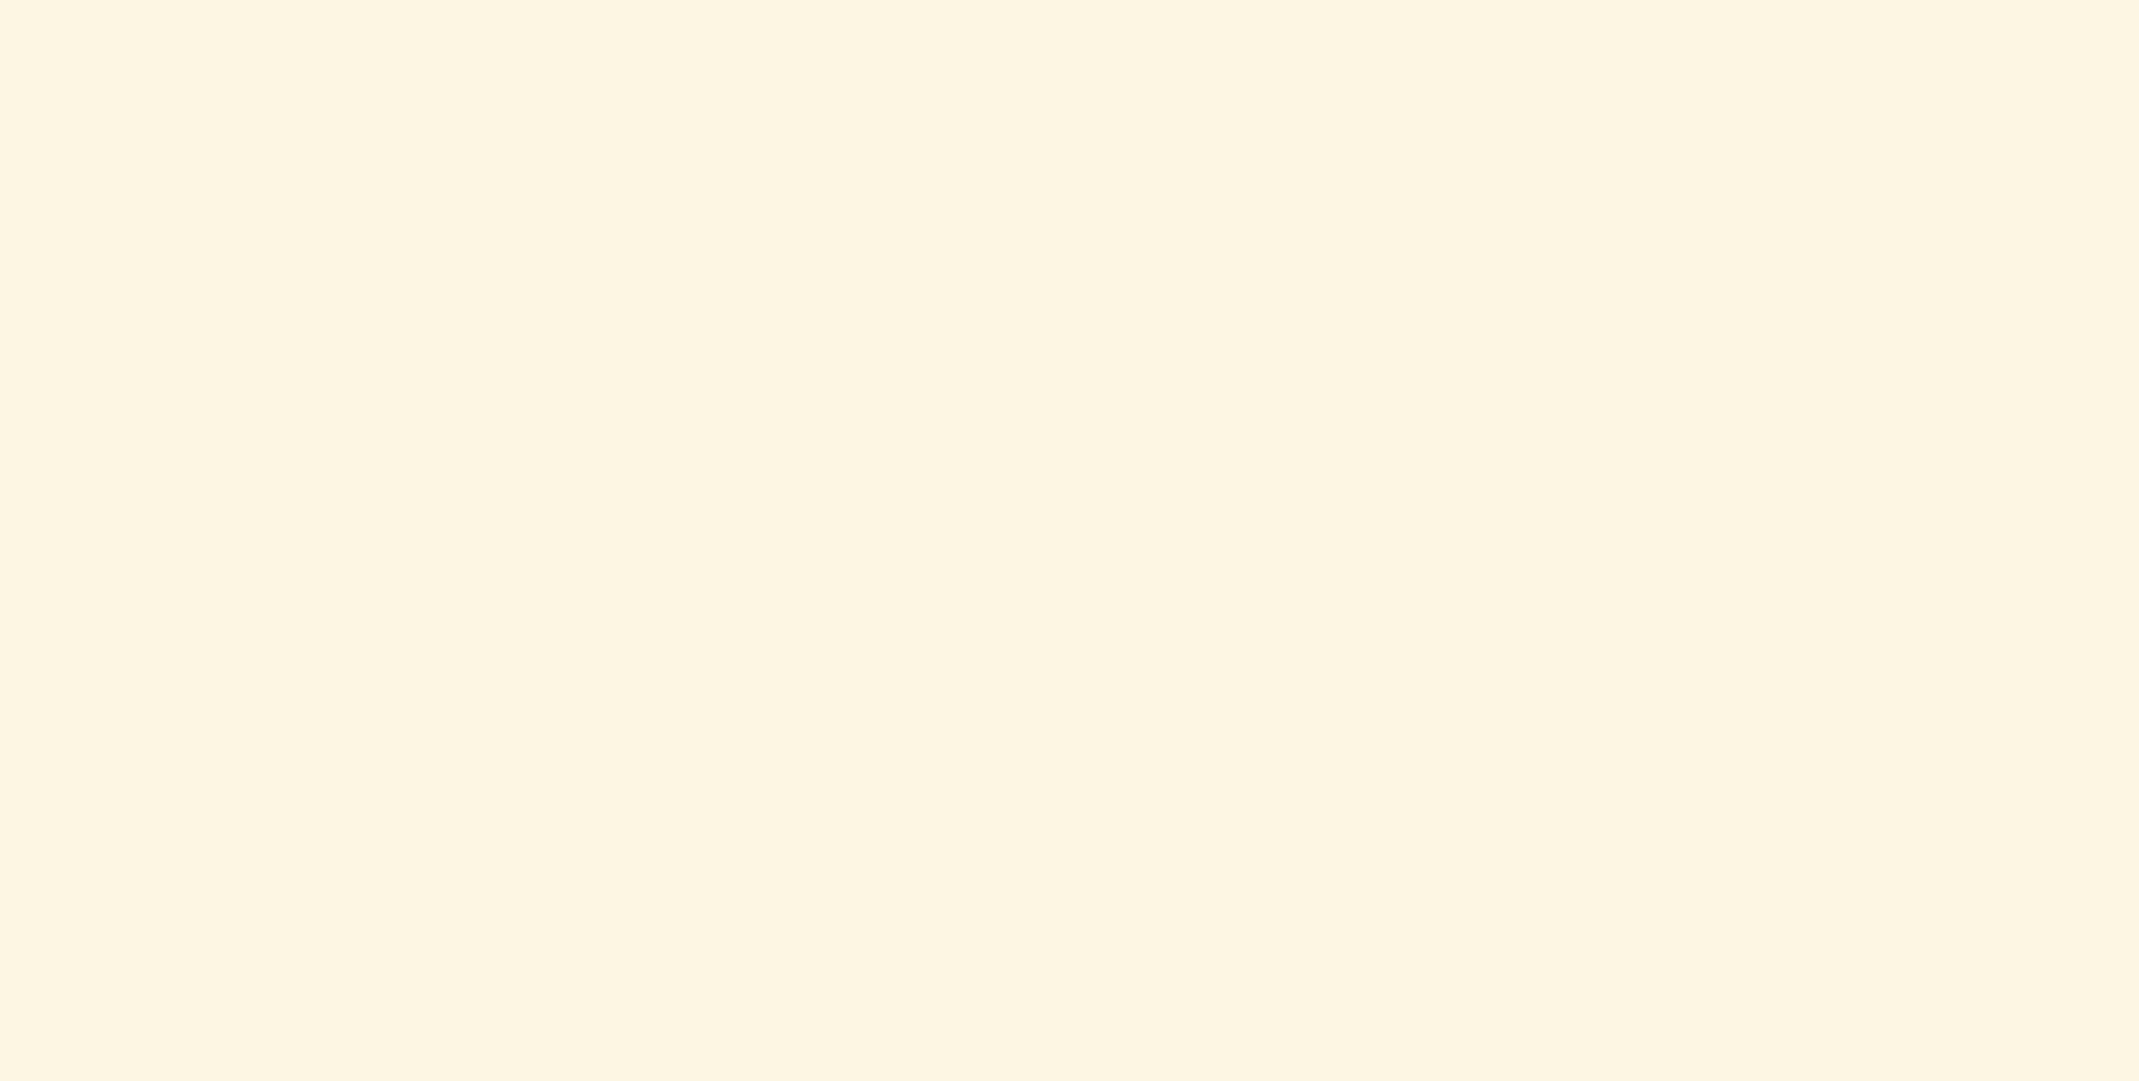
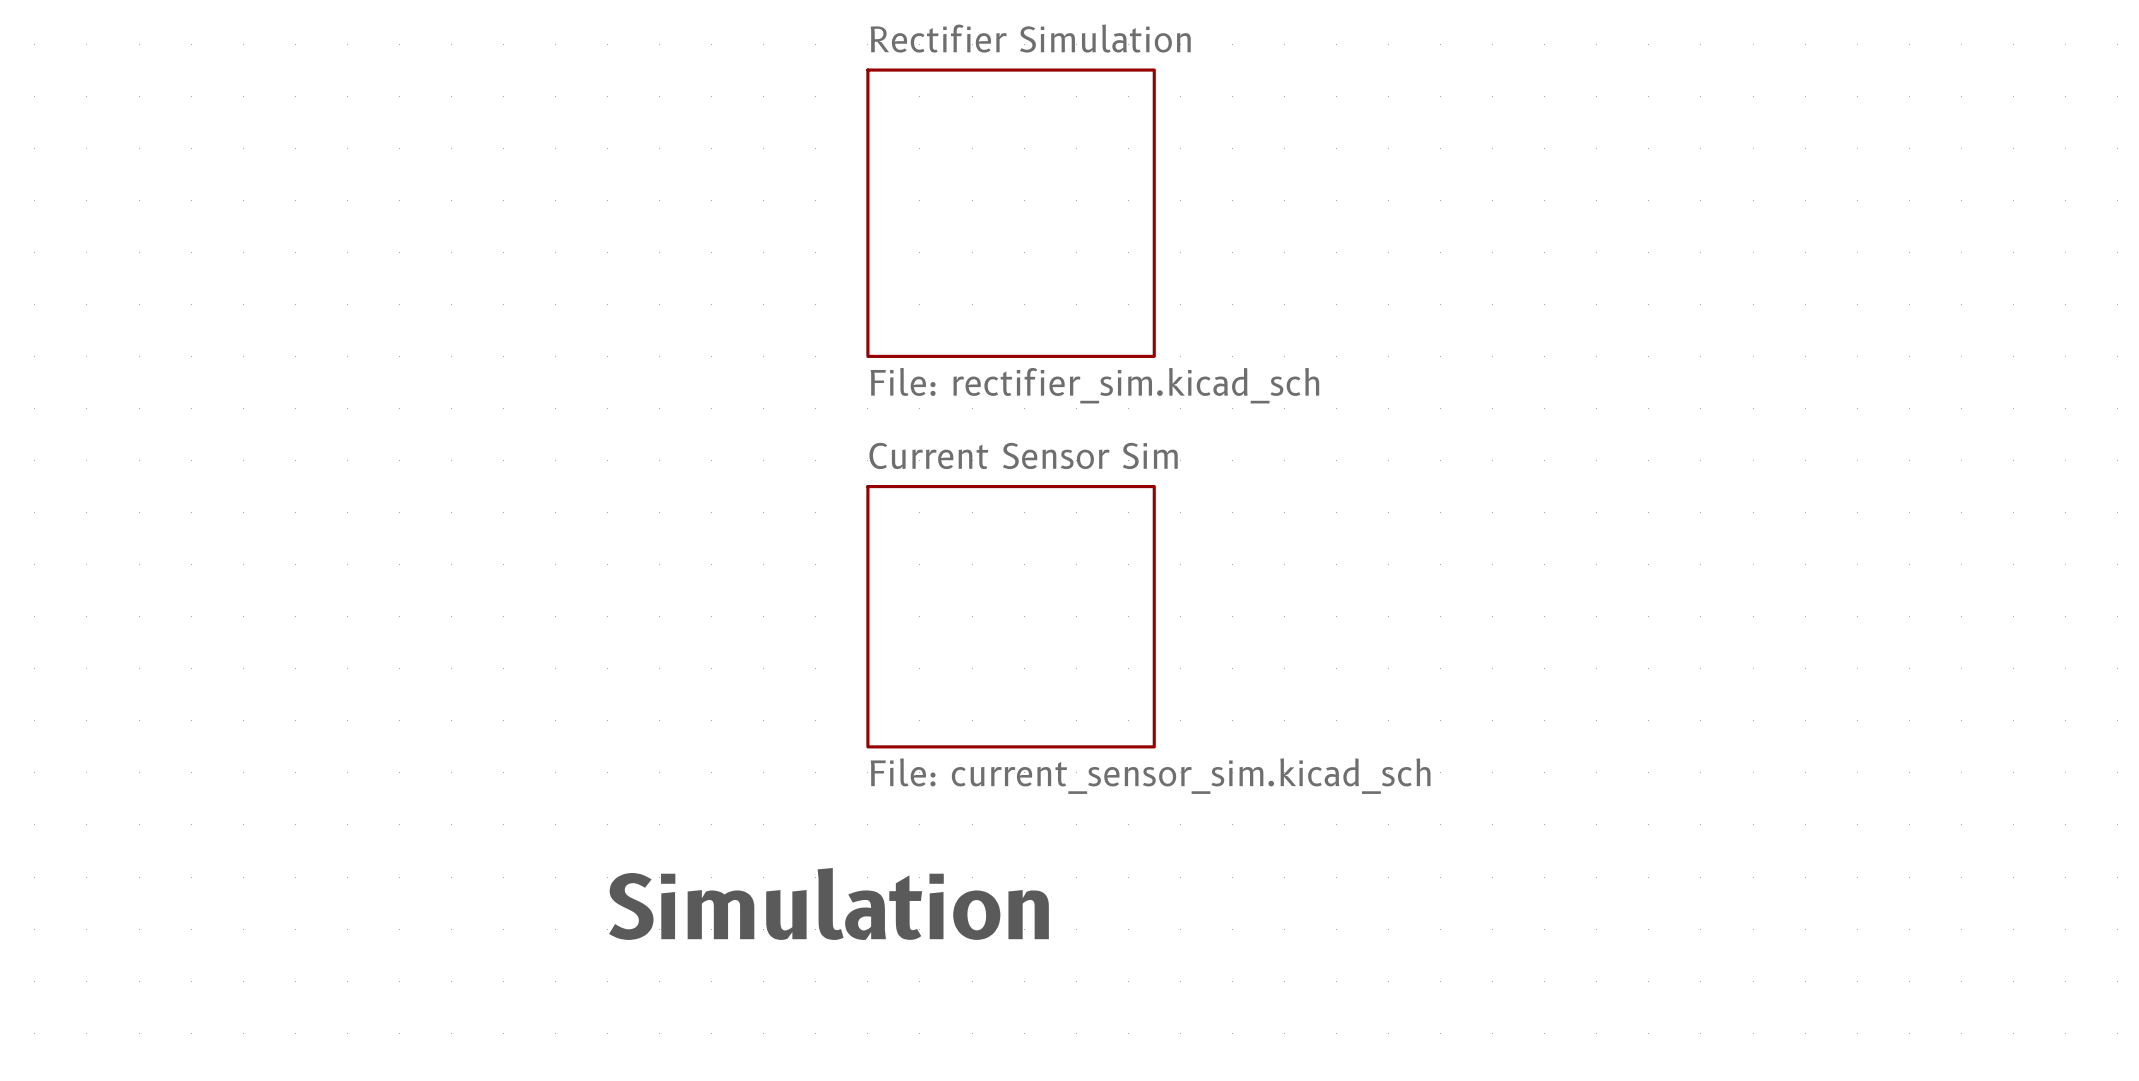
sheet Rectifier Simulation: none -> File: rectifier_sim.kicad_sch (1011, 213)
sheet Current Sensor Sim: none -> File: current_sensor_sim.kicad_sch (1011, 616)
text: none -> Simulation (828, 903)

